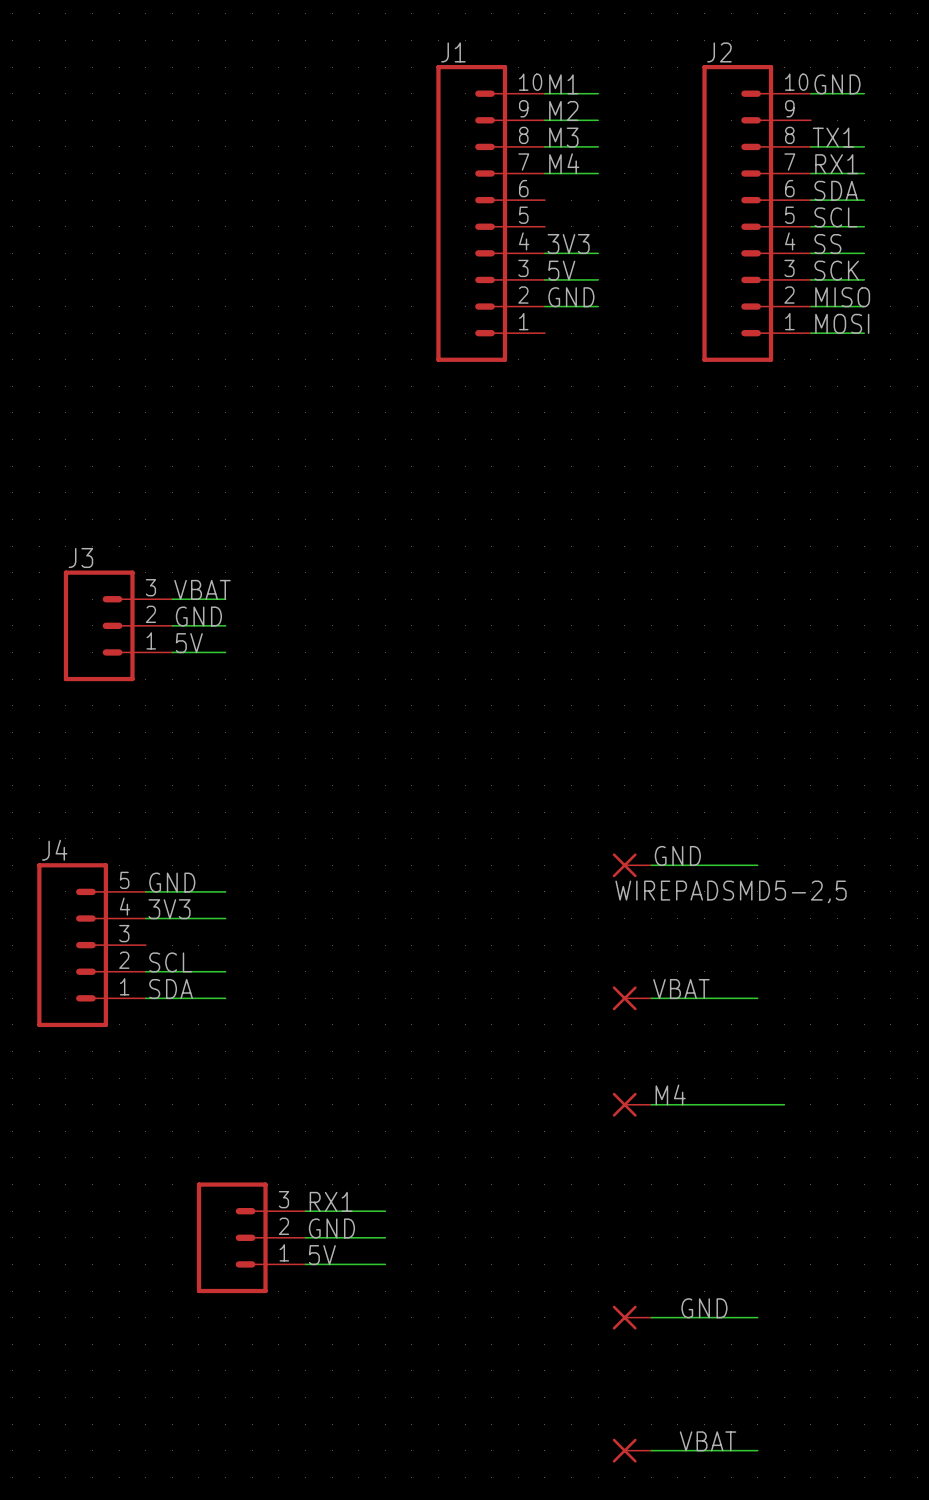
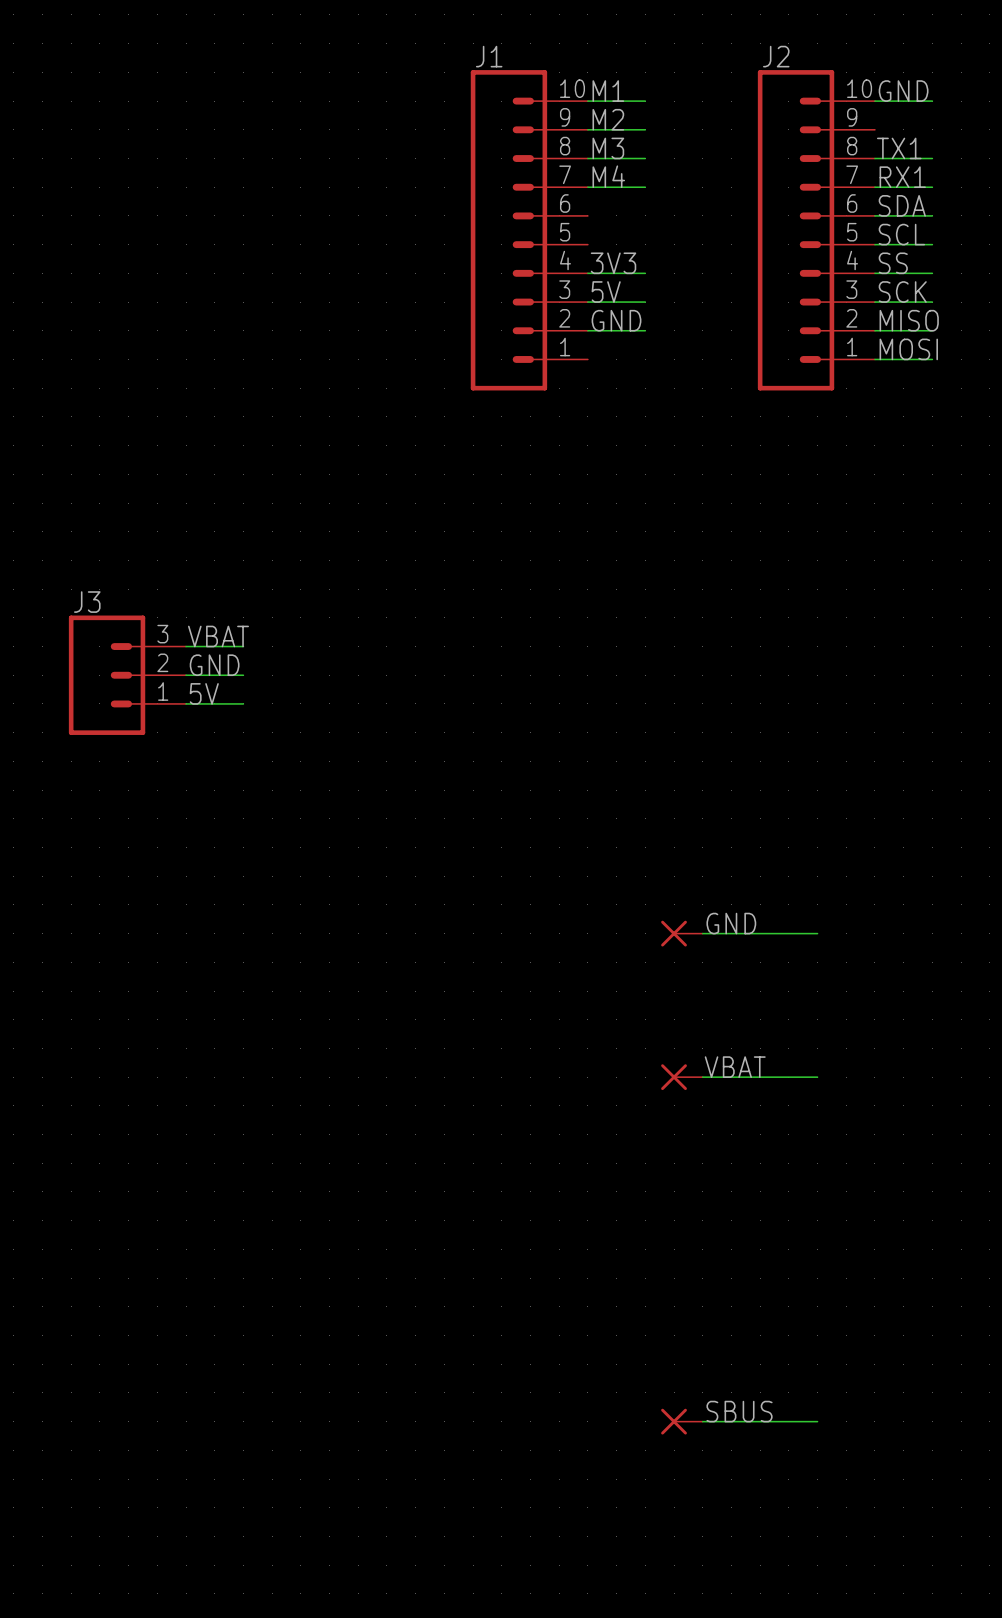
label: GND (172, 882) -> none
wire: (145, 891) (225, 891) -> none
part value: WIREPADSMD5-2,5 (731, 891) -> none
label: 3V3 (169, 909) -> none
wire: (145, 918) (225, 918) -> none
J4: (91, 945) -> none
label: SCL (170, 962) -> none
wire: (145, 971) (225, 971) -> none
label: SDA (171, 989) -> none
wire: (145, 998) (225, 998) -> none
label: M4 (670, 1095) -> none
part: (632, 1104) -> none
wire: (651, 1104) (784, 1104) -> none
label: RX1 (331, 1201) -> none
wire: (305, 1211) (385, 1211) -> none
label: GND (331, 1228) -> none
part: (251, 1237) -> none
wire: (305, 1237) (385, 1237) -> none
label: 5V (322, 1255) -> none
wire: (305, 1264) (385, 1264) -> none
label: none -> SBUS (739, 1411)
label: GND (704, 1308) -> none
label: VBAT (708, 1441) -> none
part: (632, 1450) -> none
wire: (651, 1450) (757, 1450) -> none

